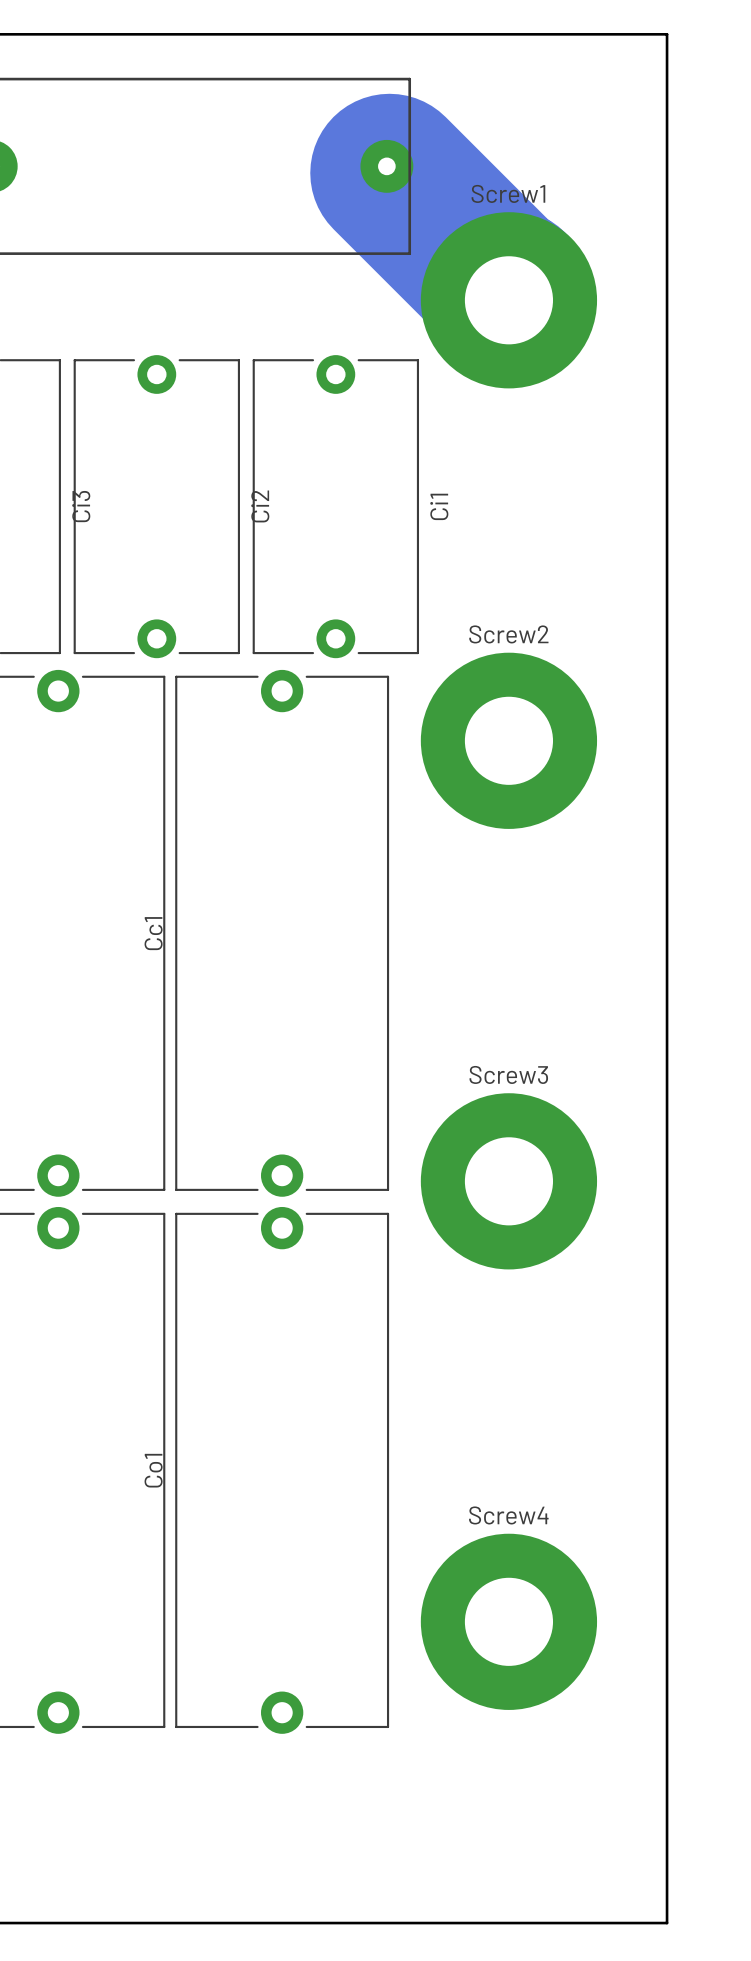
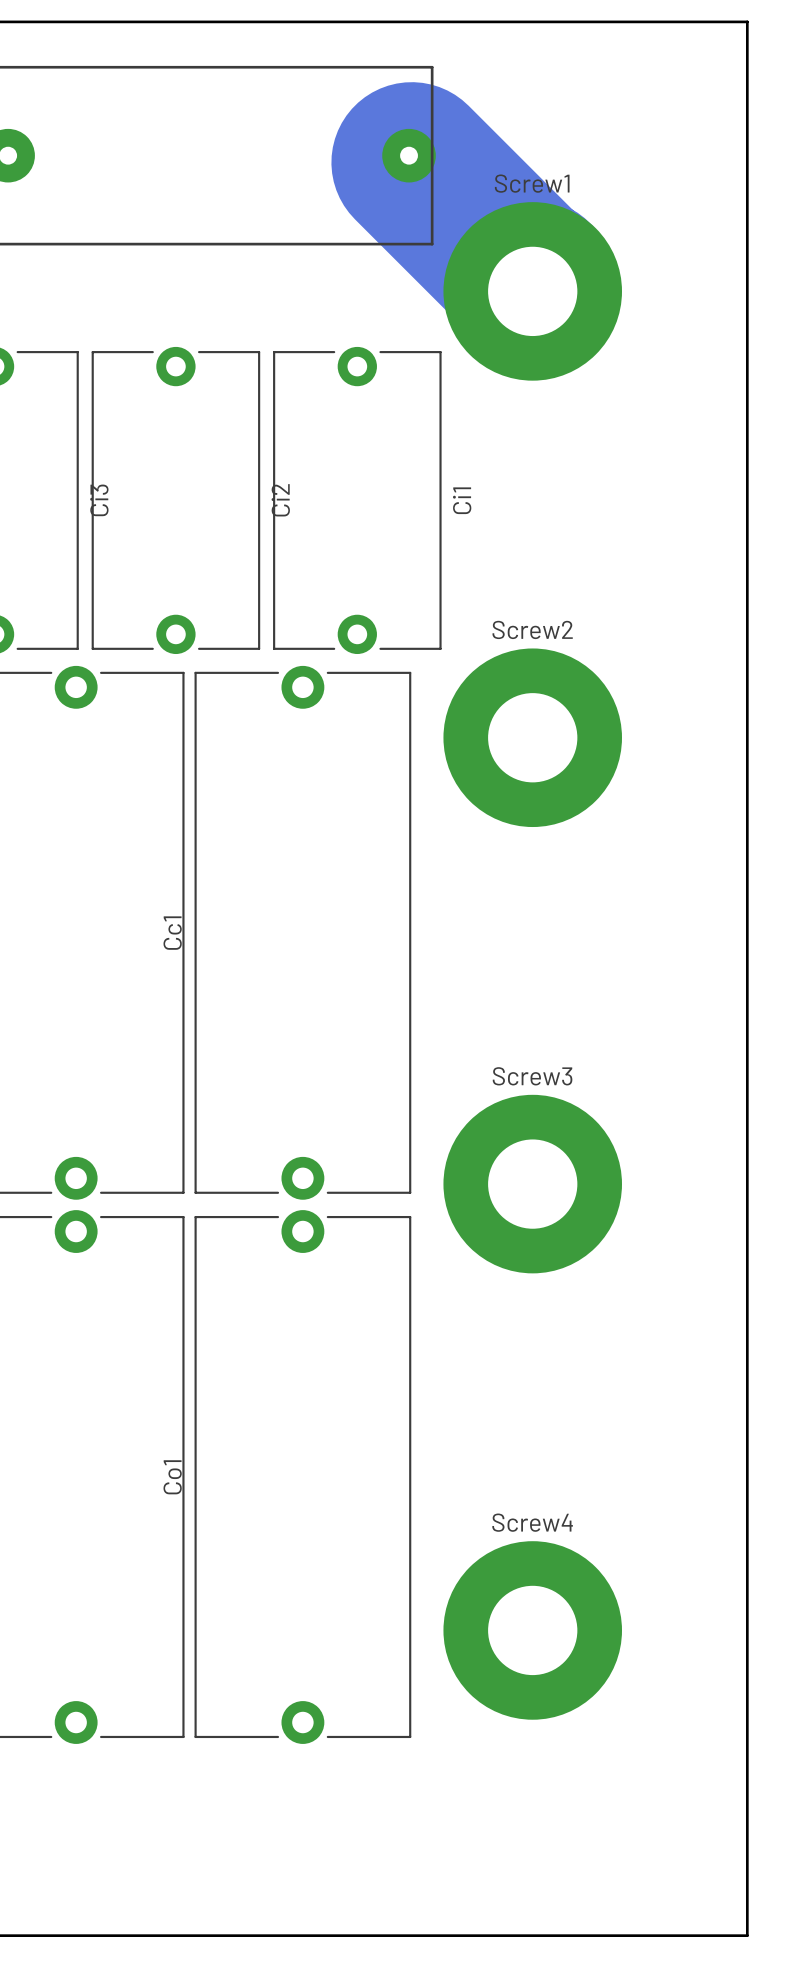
board edge: (667, 34) (667, 1923) -> (692, 21) (747, 21) (747, 1935) (692, 1935)

